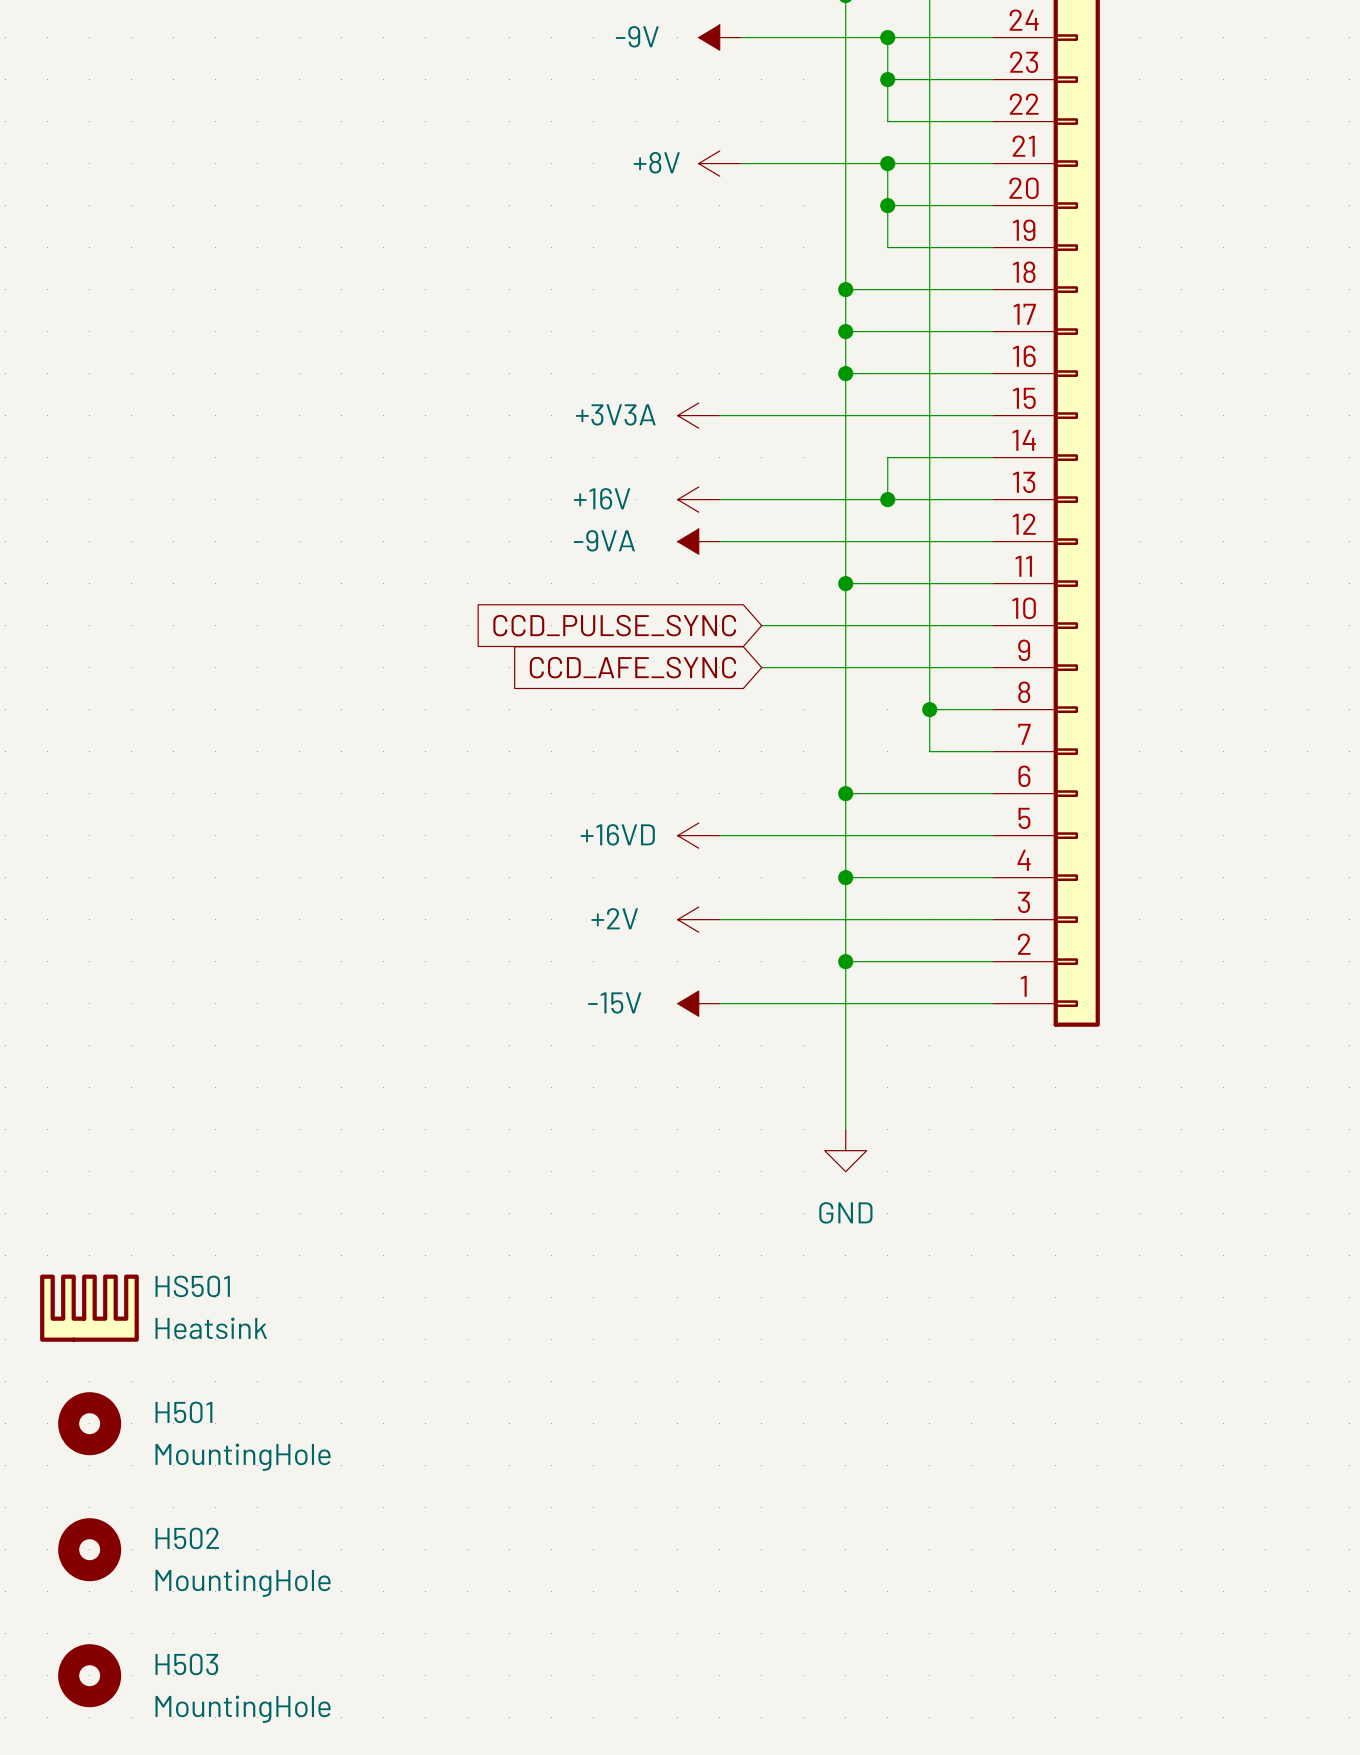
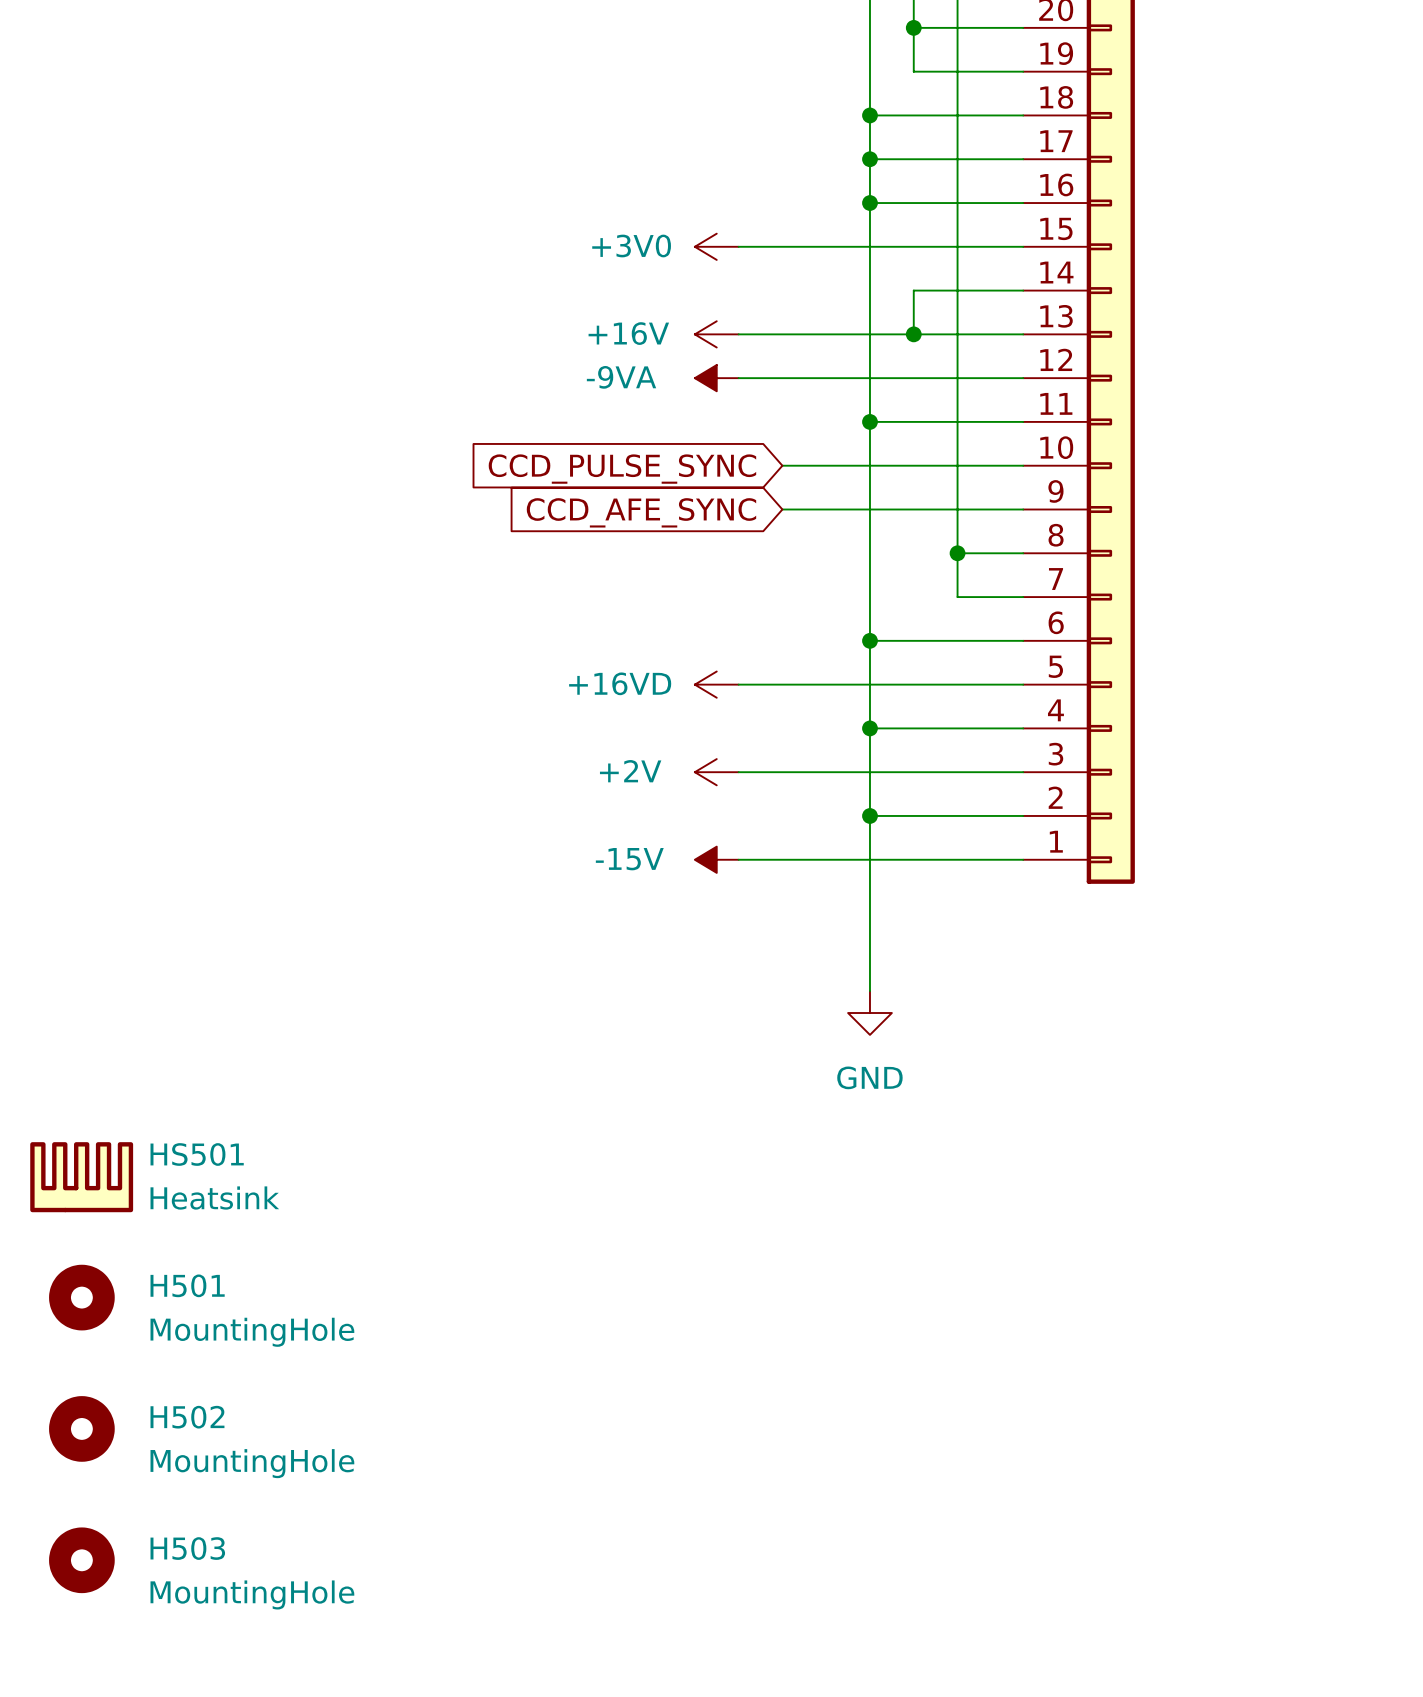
power symbol: +3V3A (698, 415) -> +3V0 (716, 246)

